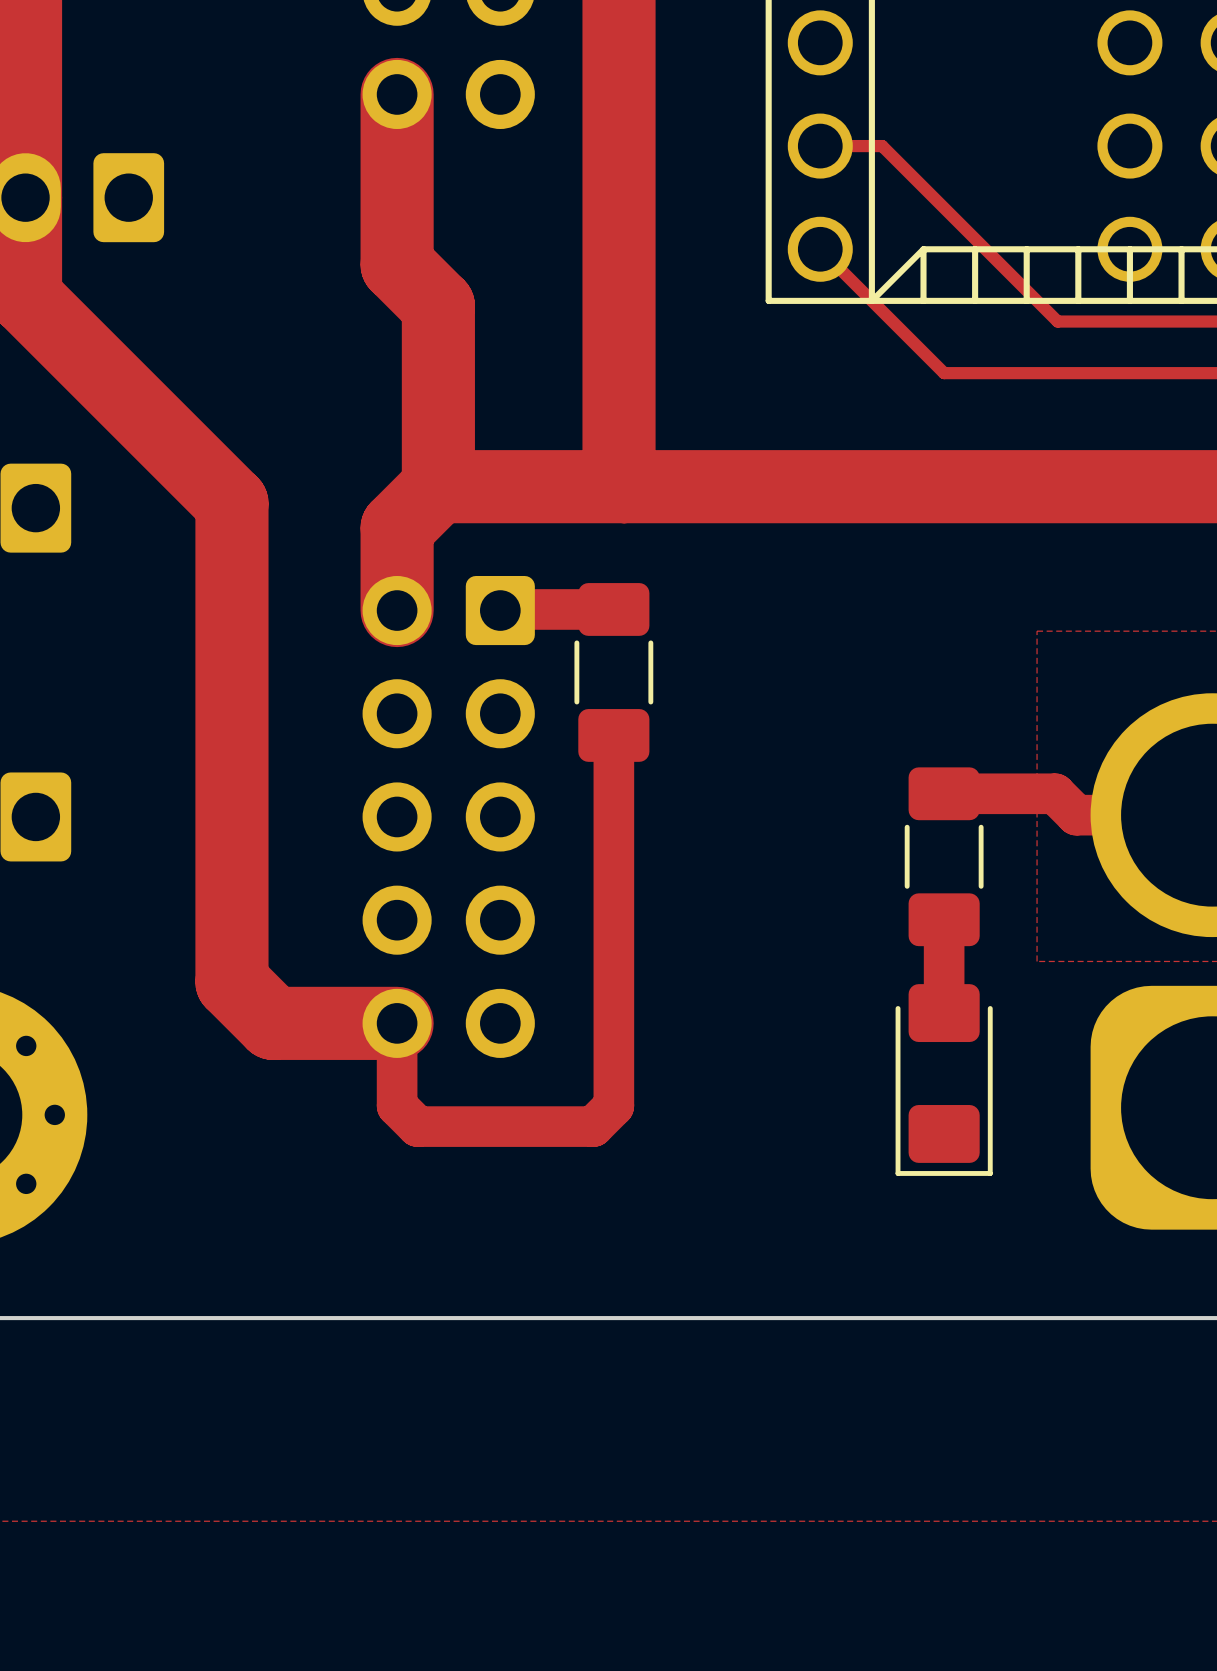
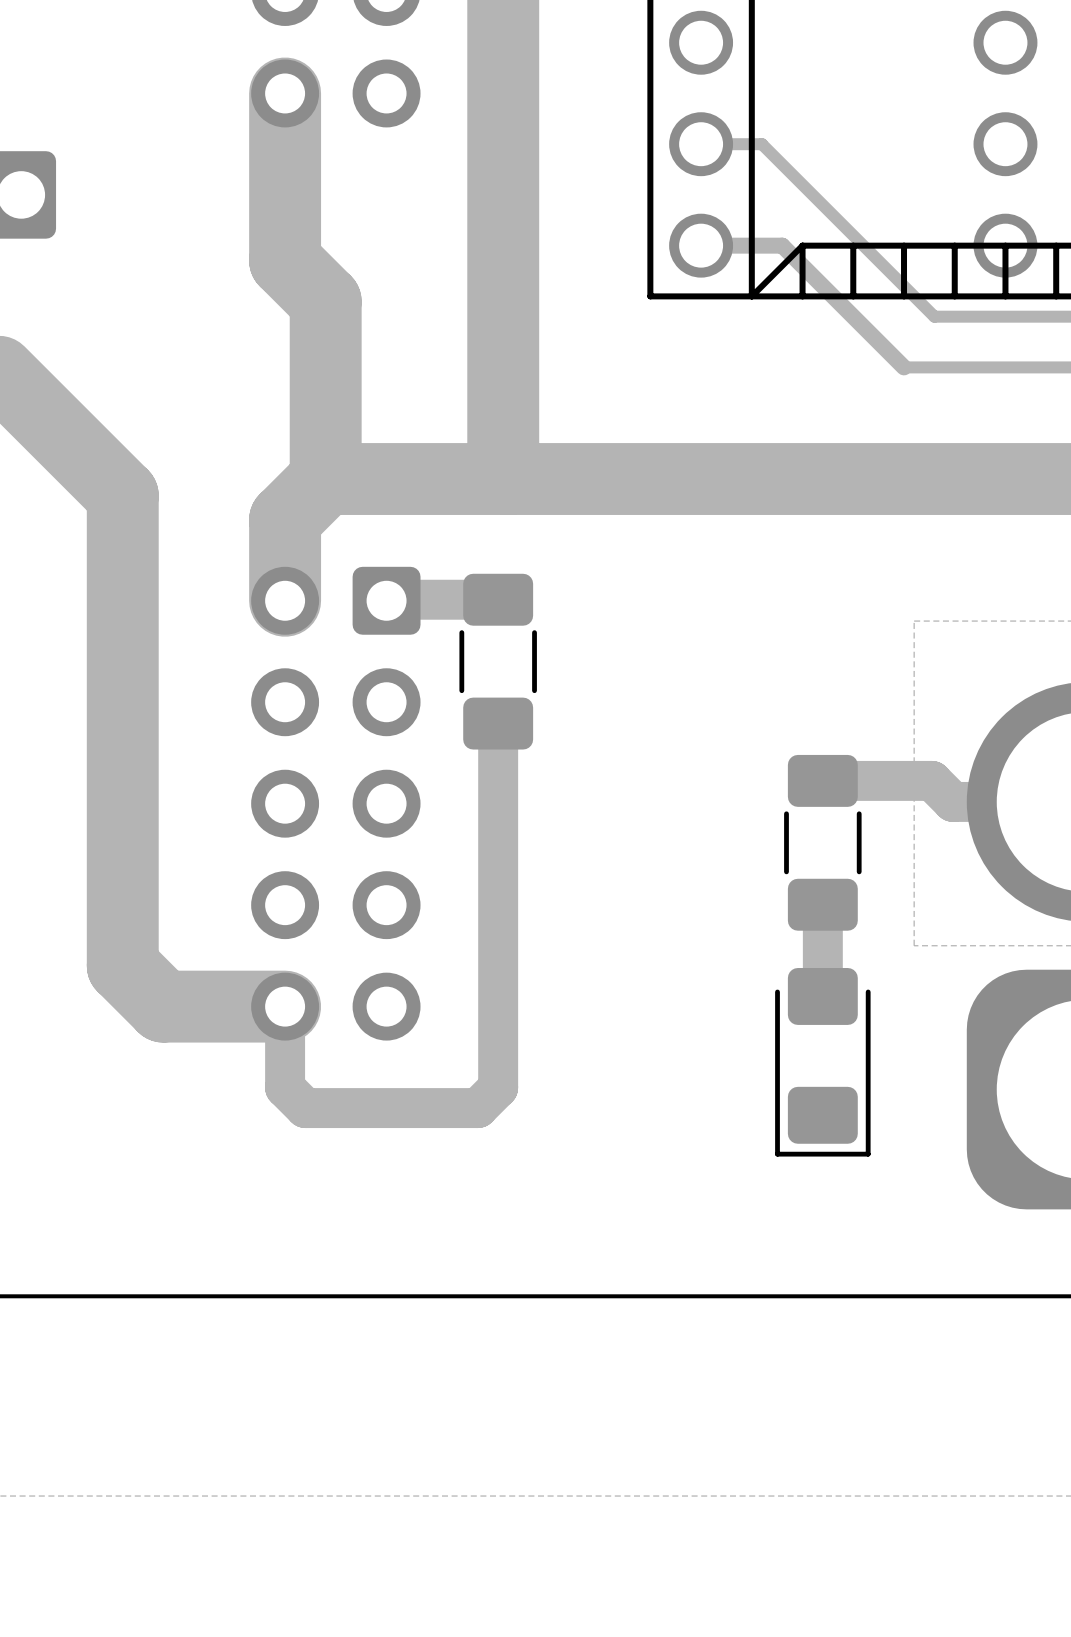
track: (820, 249) (944, 373) (1026, 373) -> (701, 245) (782, 245) (904, 367)

